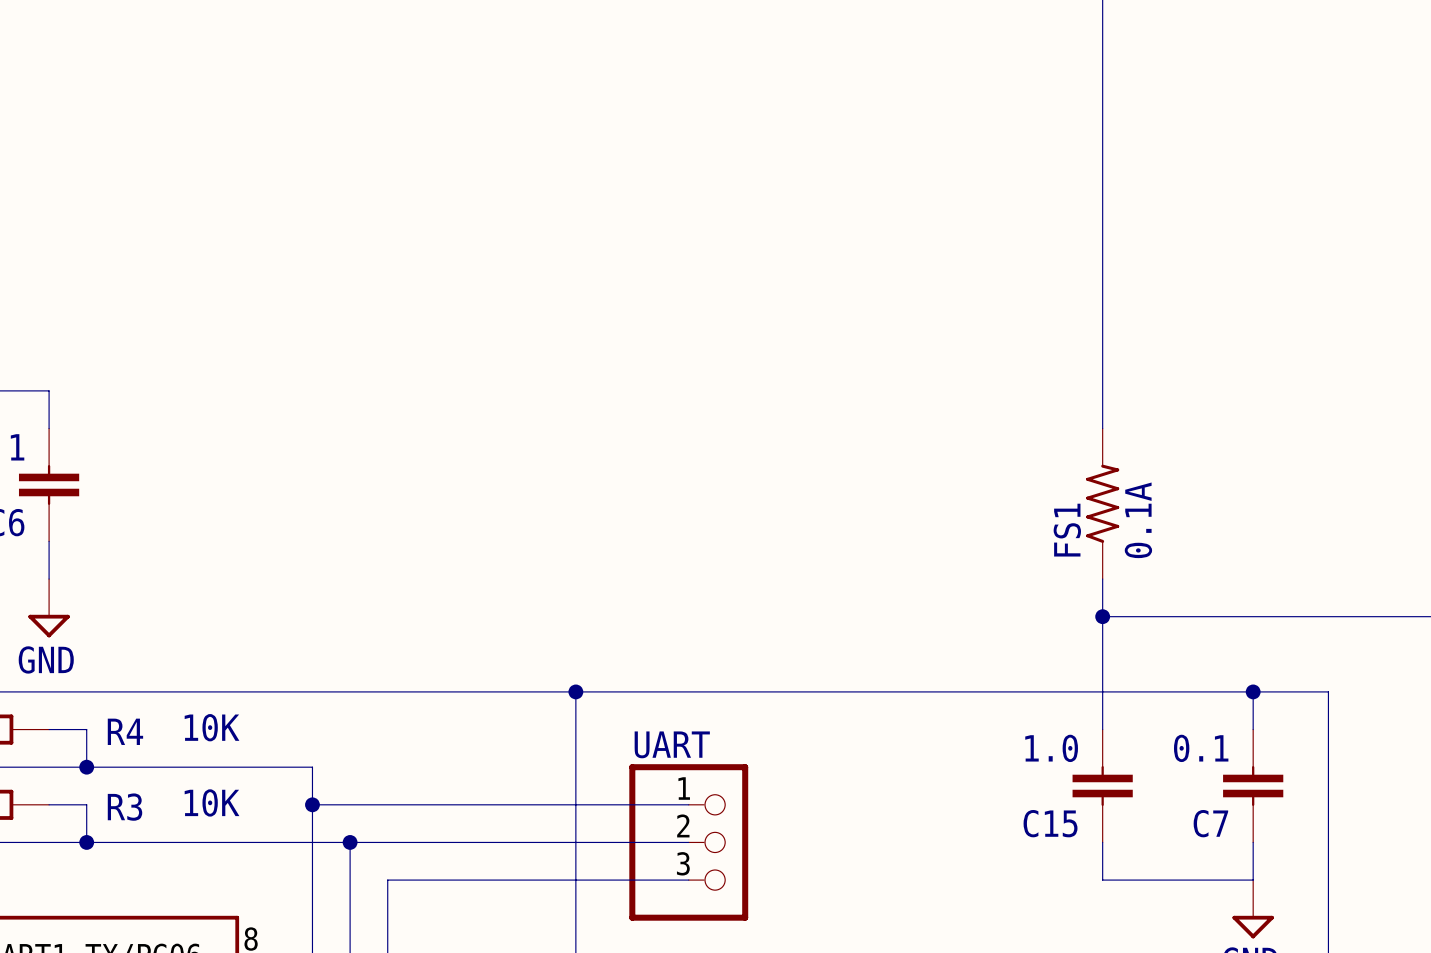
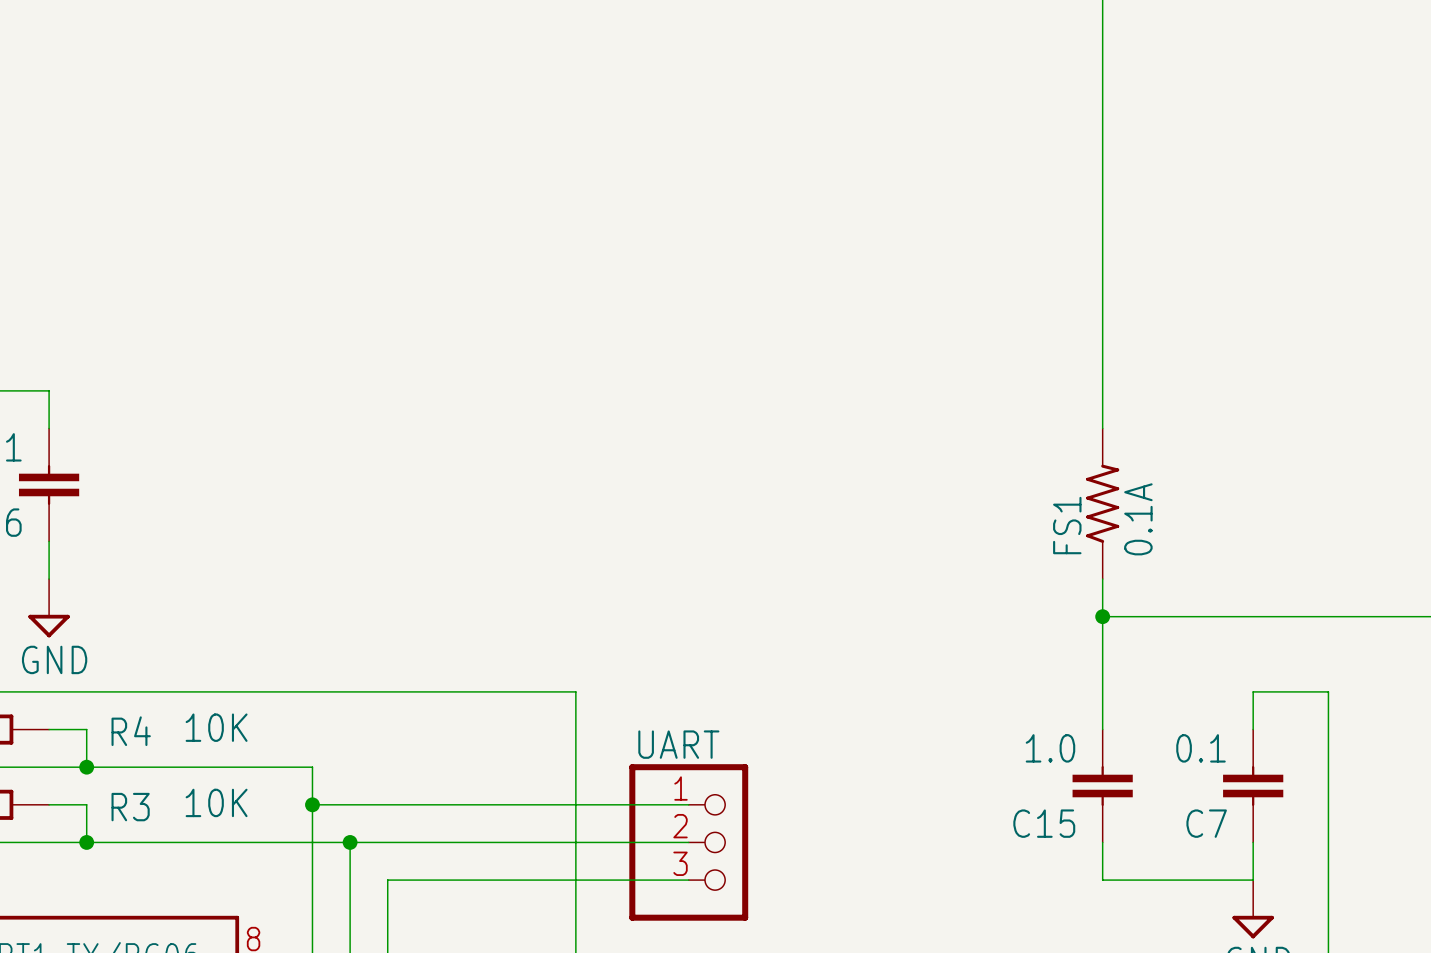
wire: (575, 691) (1253, 691) -> none
junction: (575, 691) -> none
junction: (1253, 691) -> none

